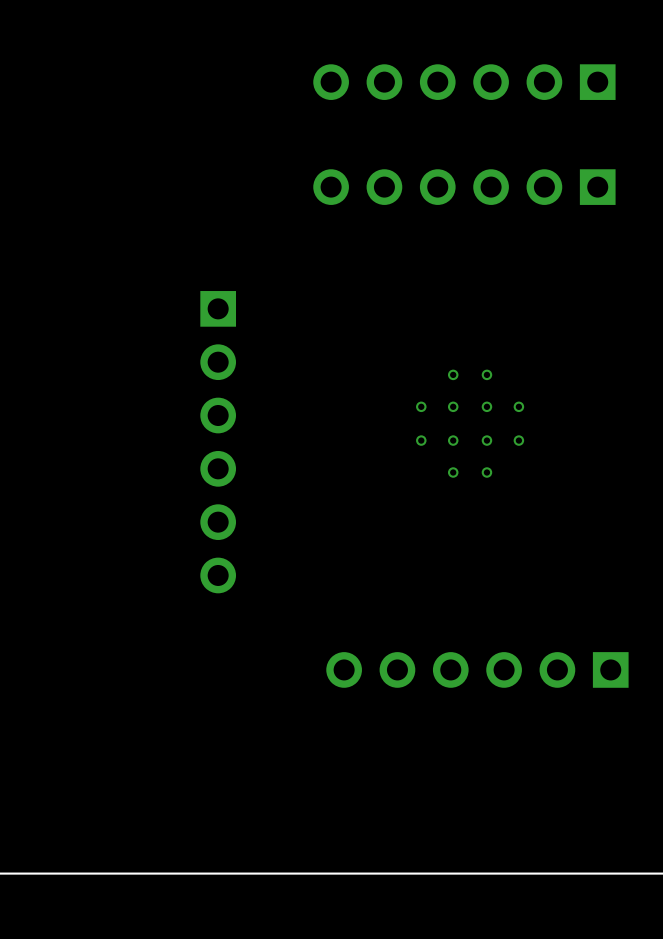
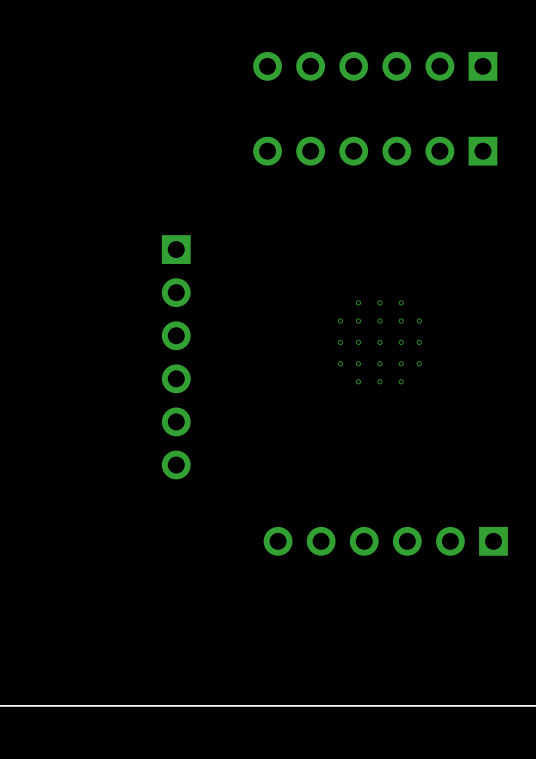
part footprint: [416, 369, 525, 478] -> [337, 300, 422, 385]

